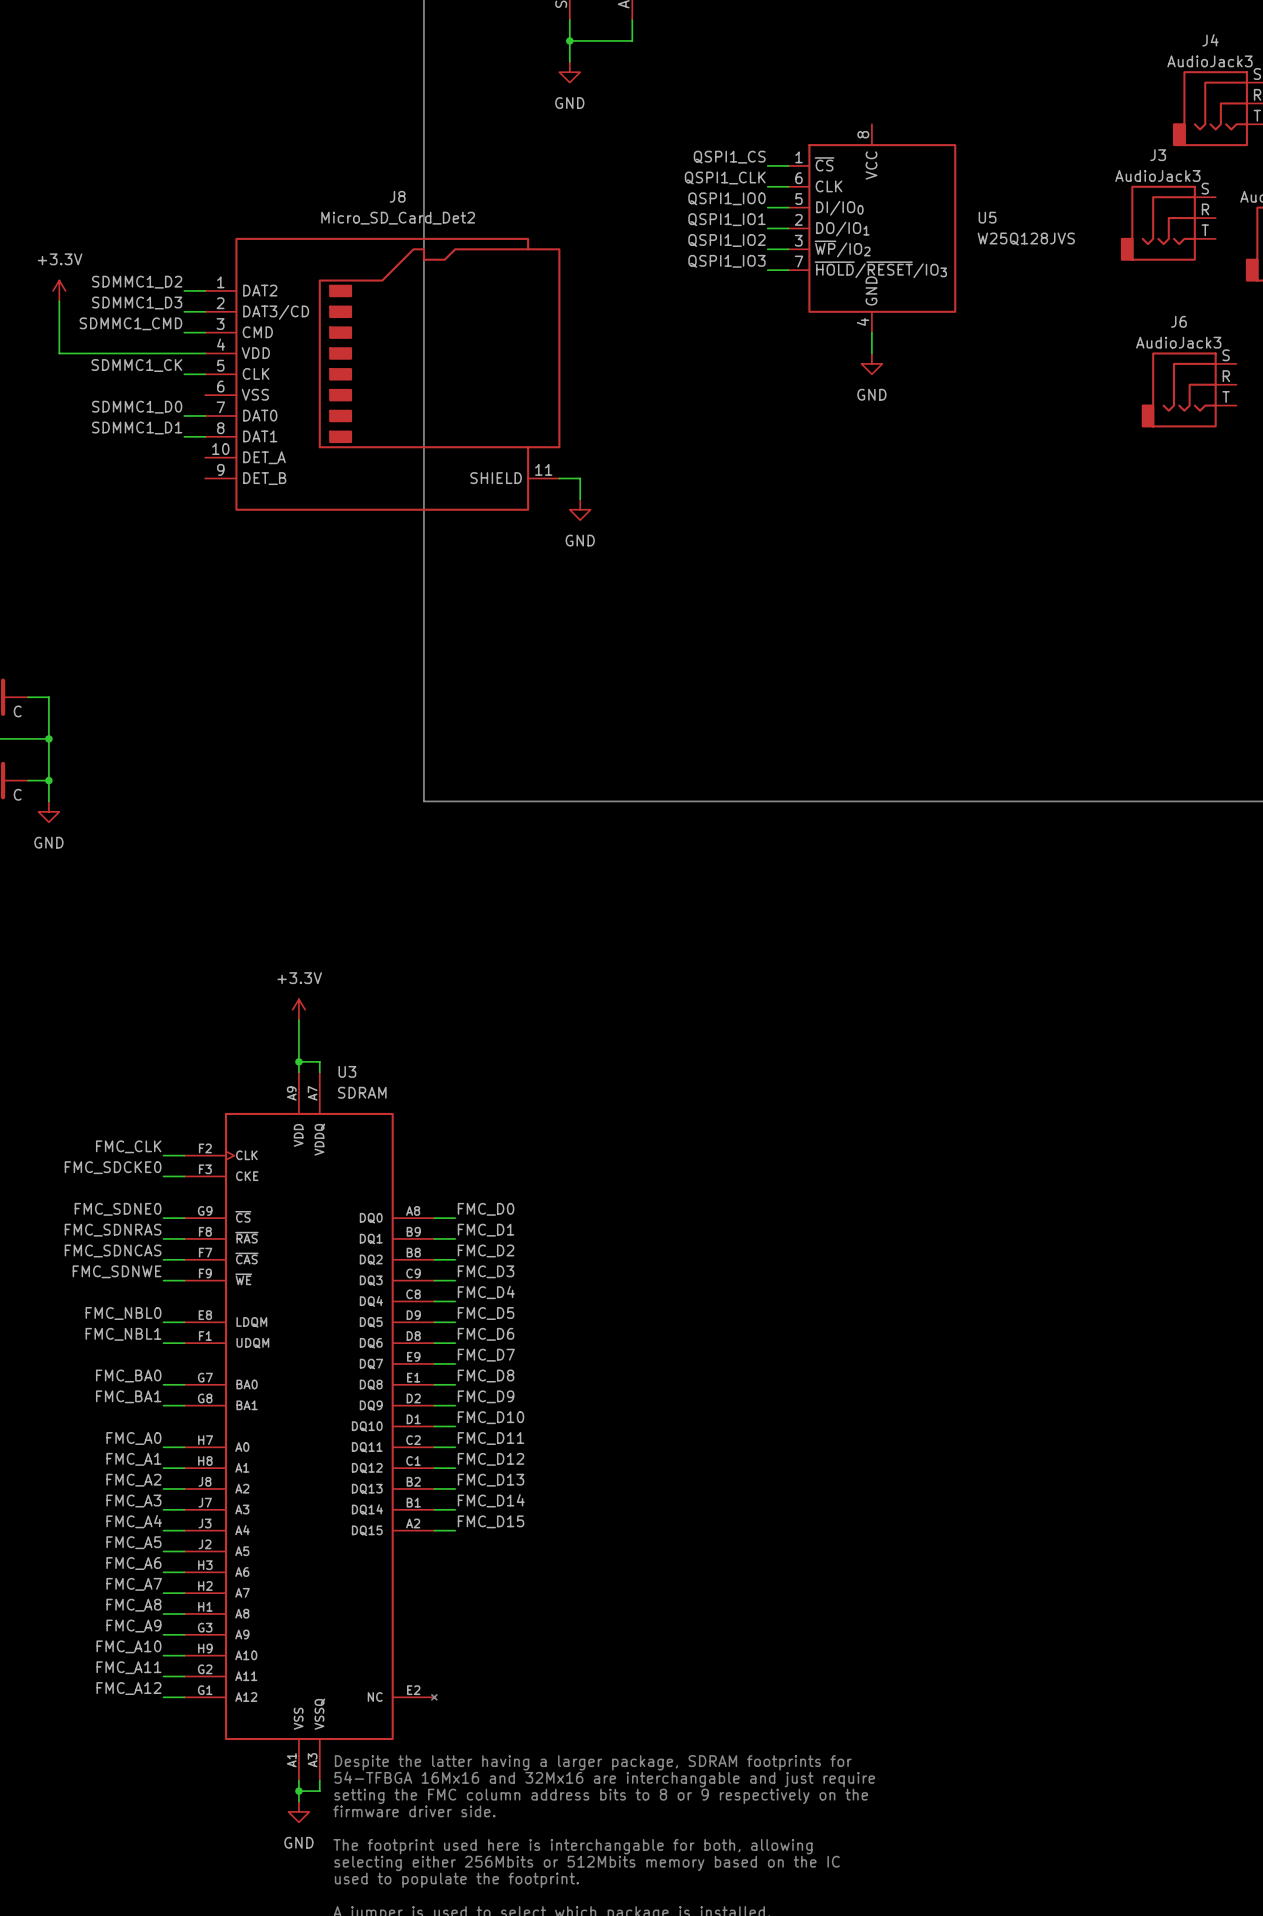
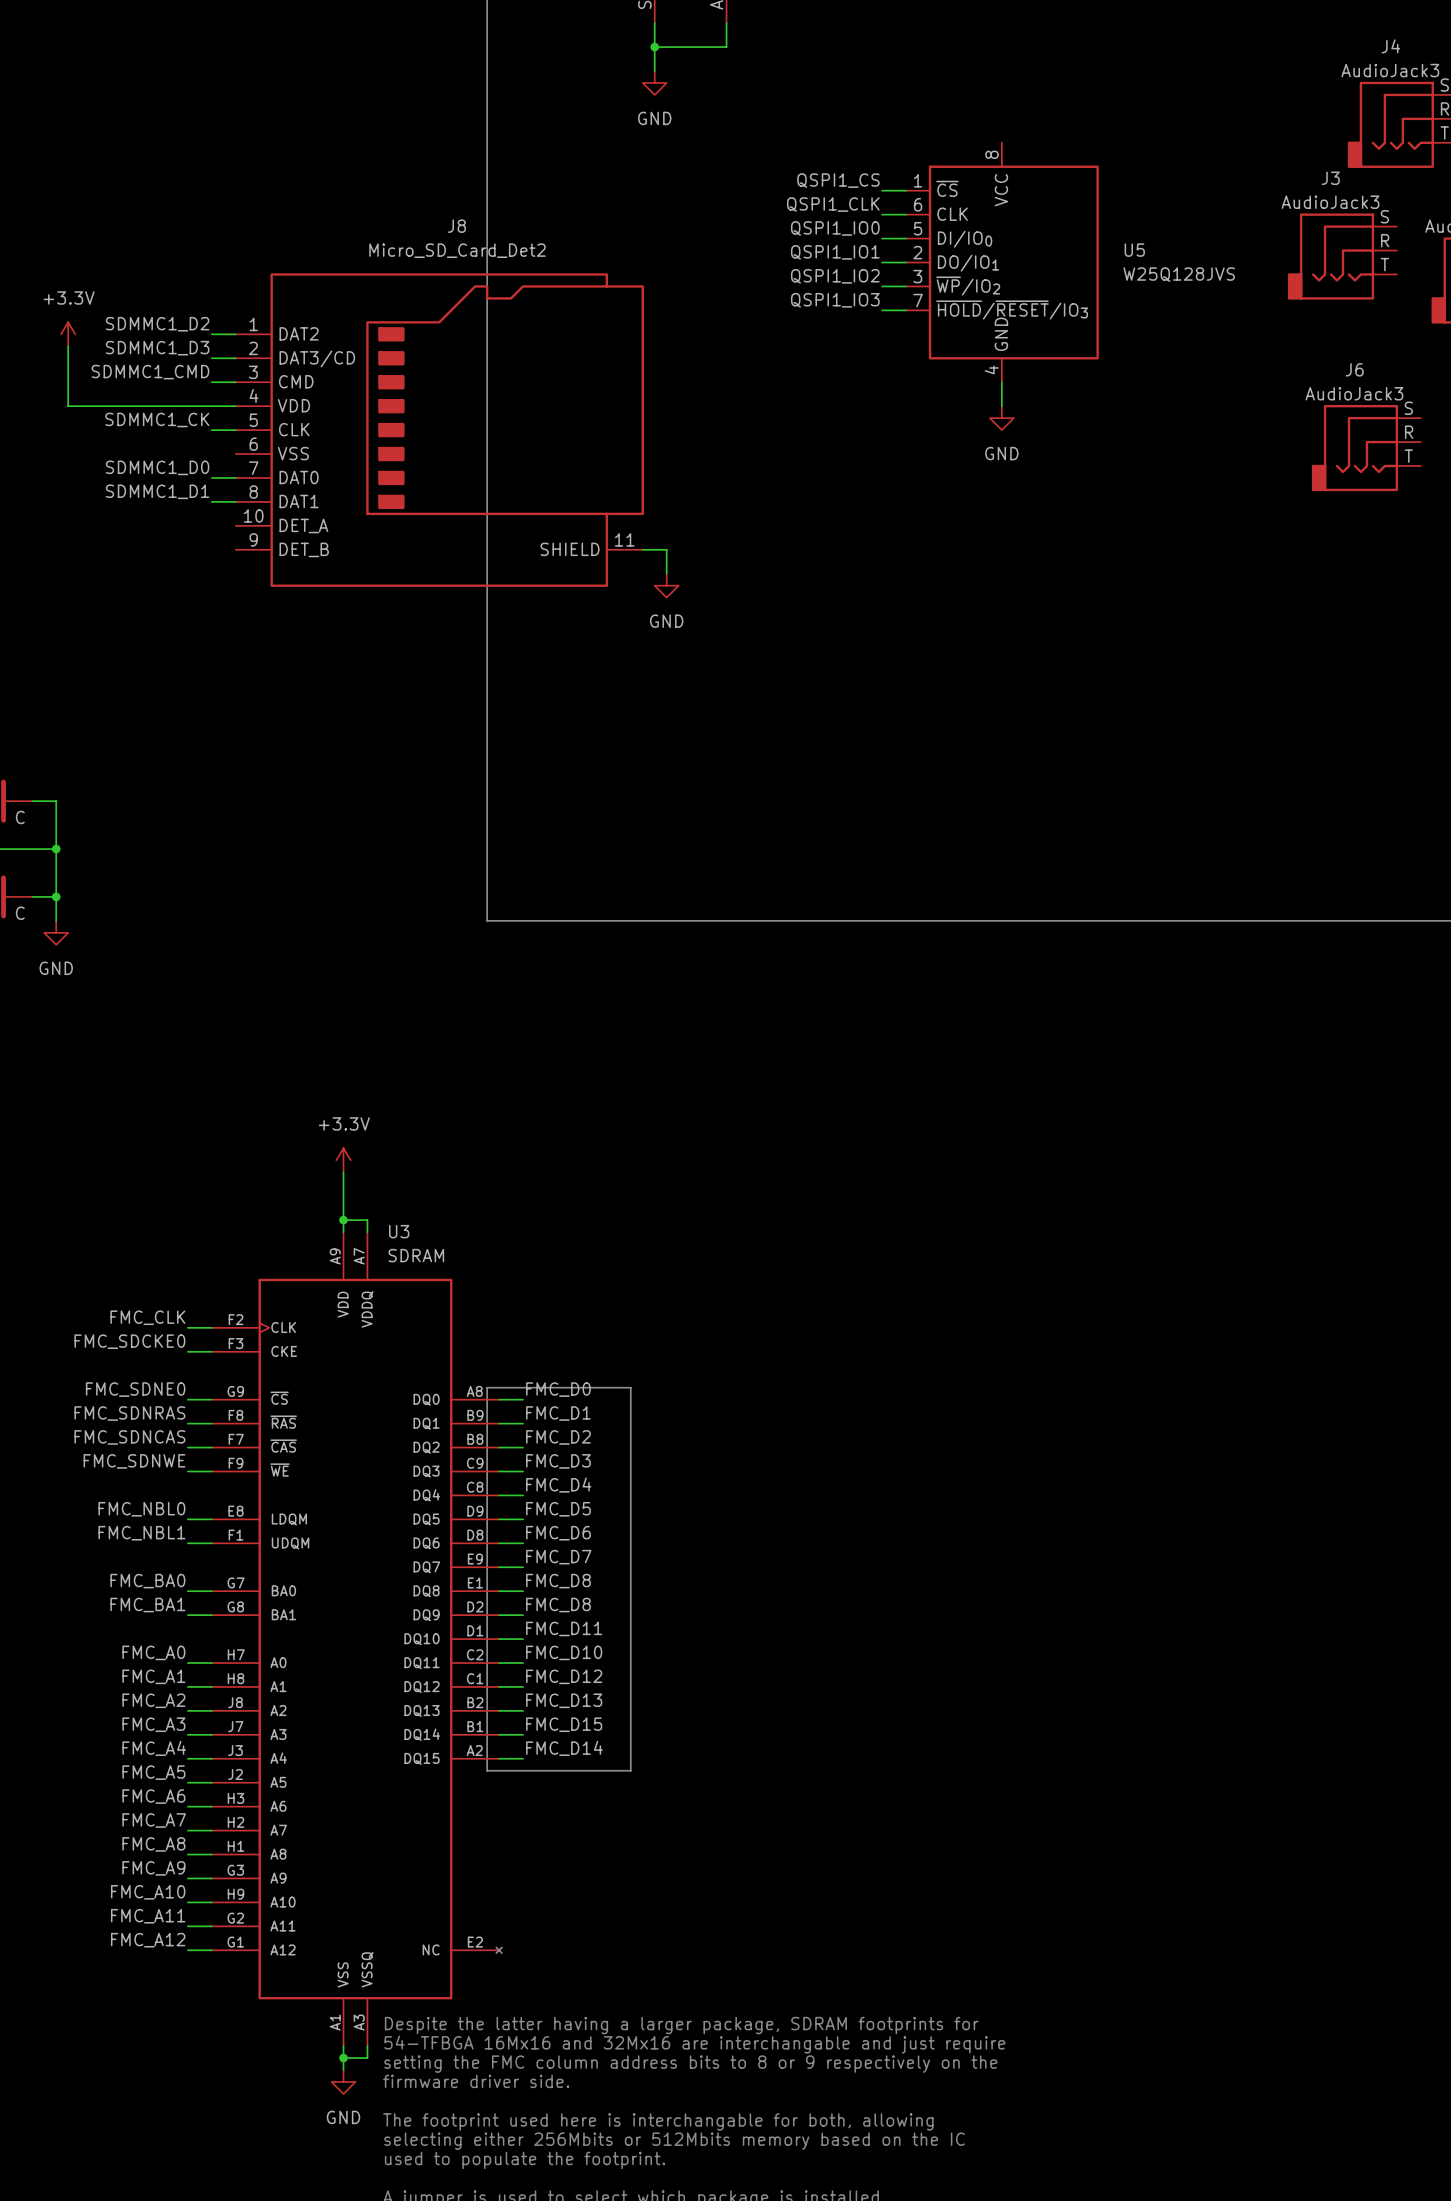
line: none -> (487, 1387) (630, 1387) (630, 1770) (487, 1770) (487, 1387)
label: FMC_D9 (486, 1396) -> FMC_D8 (558, 1605)
label: FMC_D10 (491, 1417) -> FMC_D11 (564, 1628)
label: FMC_D11 (491, 1438) -> FMC_D10 (564, 1652)
label: FMC_D14 (491, 1500) -> FMC_D15 (564, 1724)
label: FMC_D15 (491, 1521) -> FMC_D14 (564, 1748)

